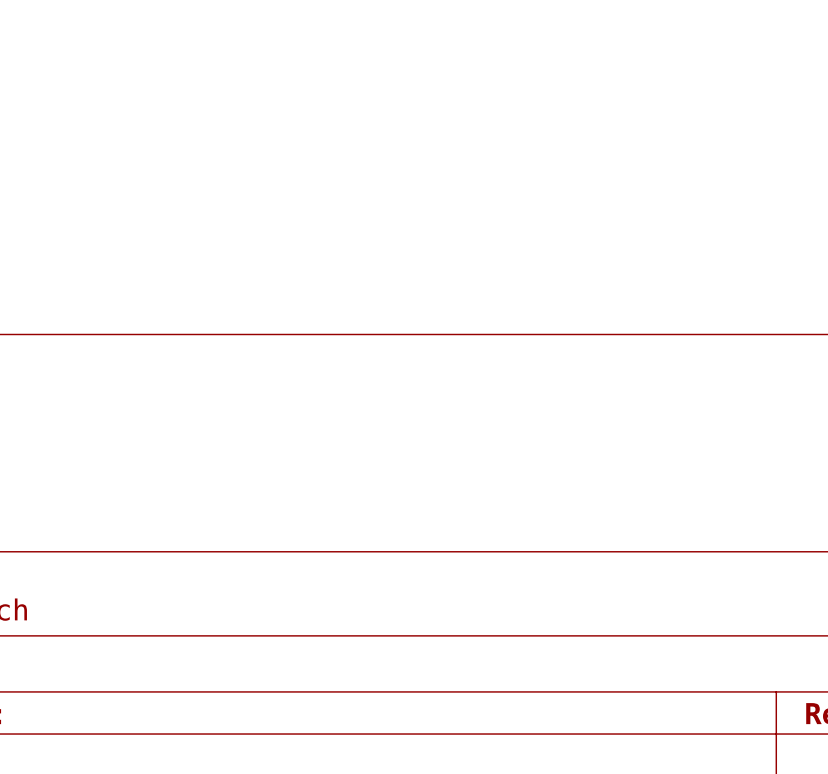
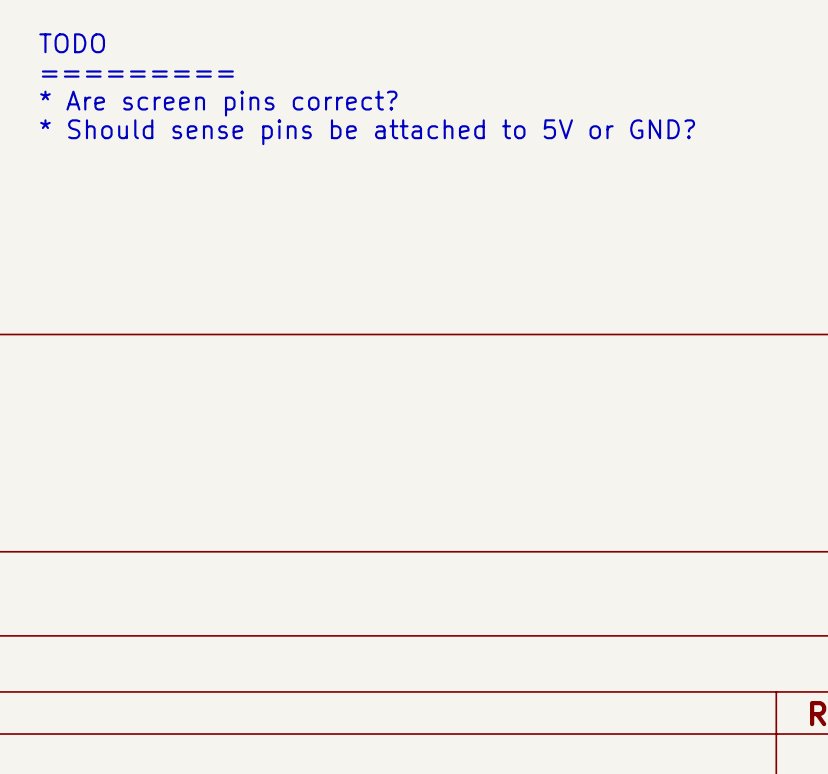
text: none -> TODO (72, 43)
text: none -> ========= (137, 74)
text: none -> * Are screen pins correct? (218, 103)
text: none -> * Should sense pins be attached to 5V or GND? (367, 132)

